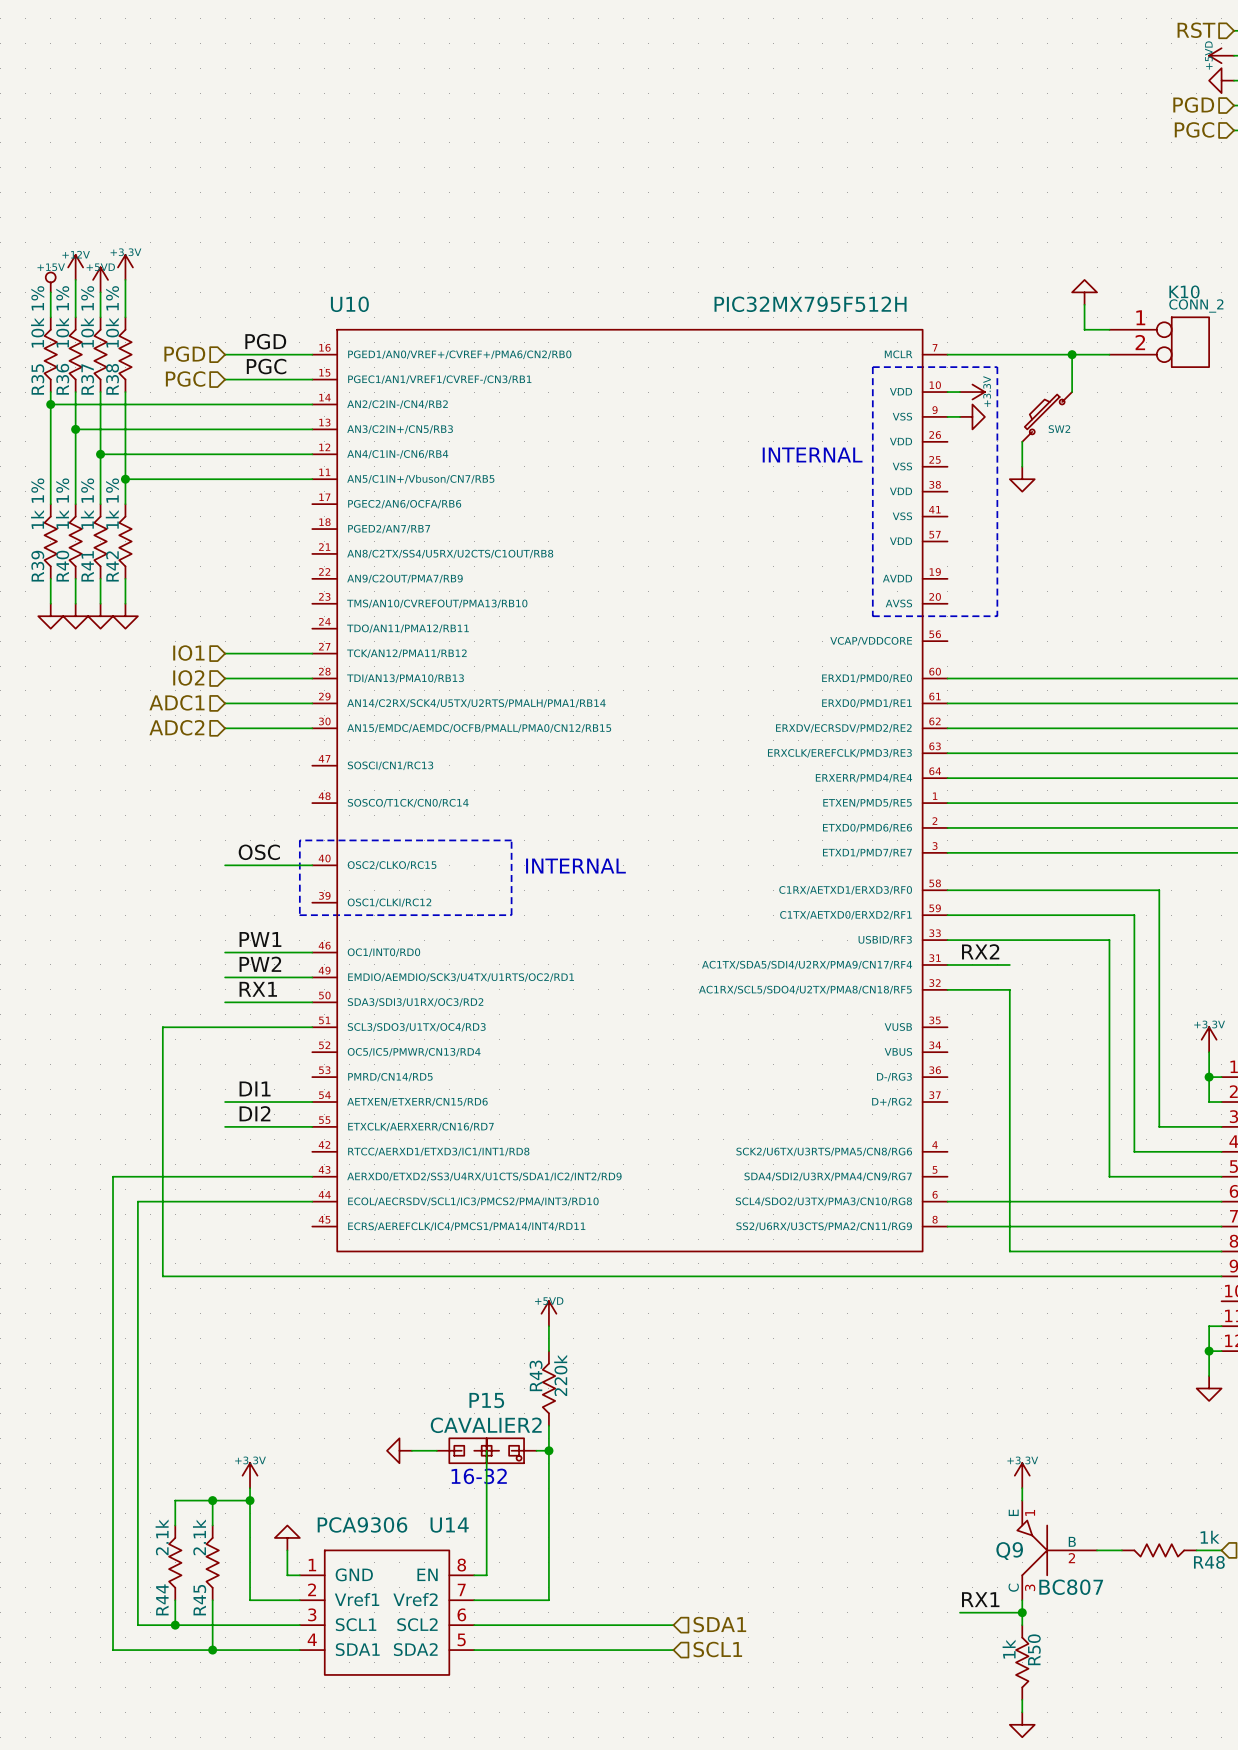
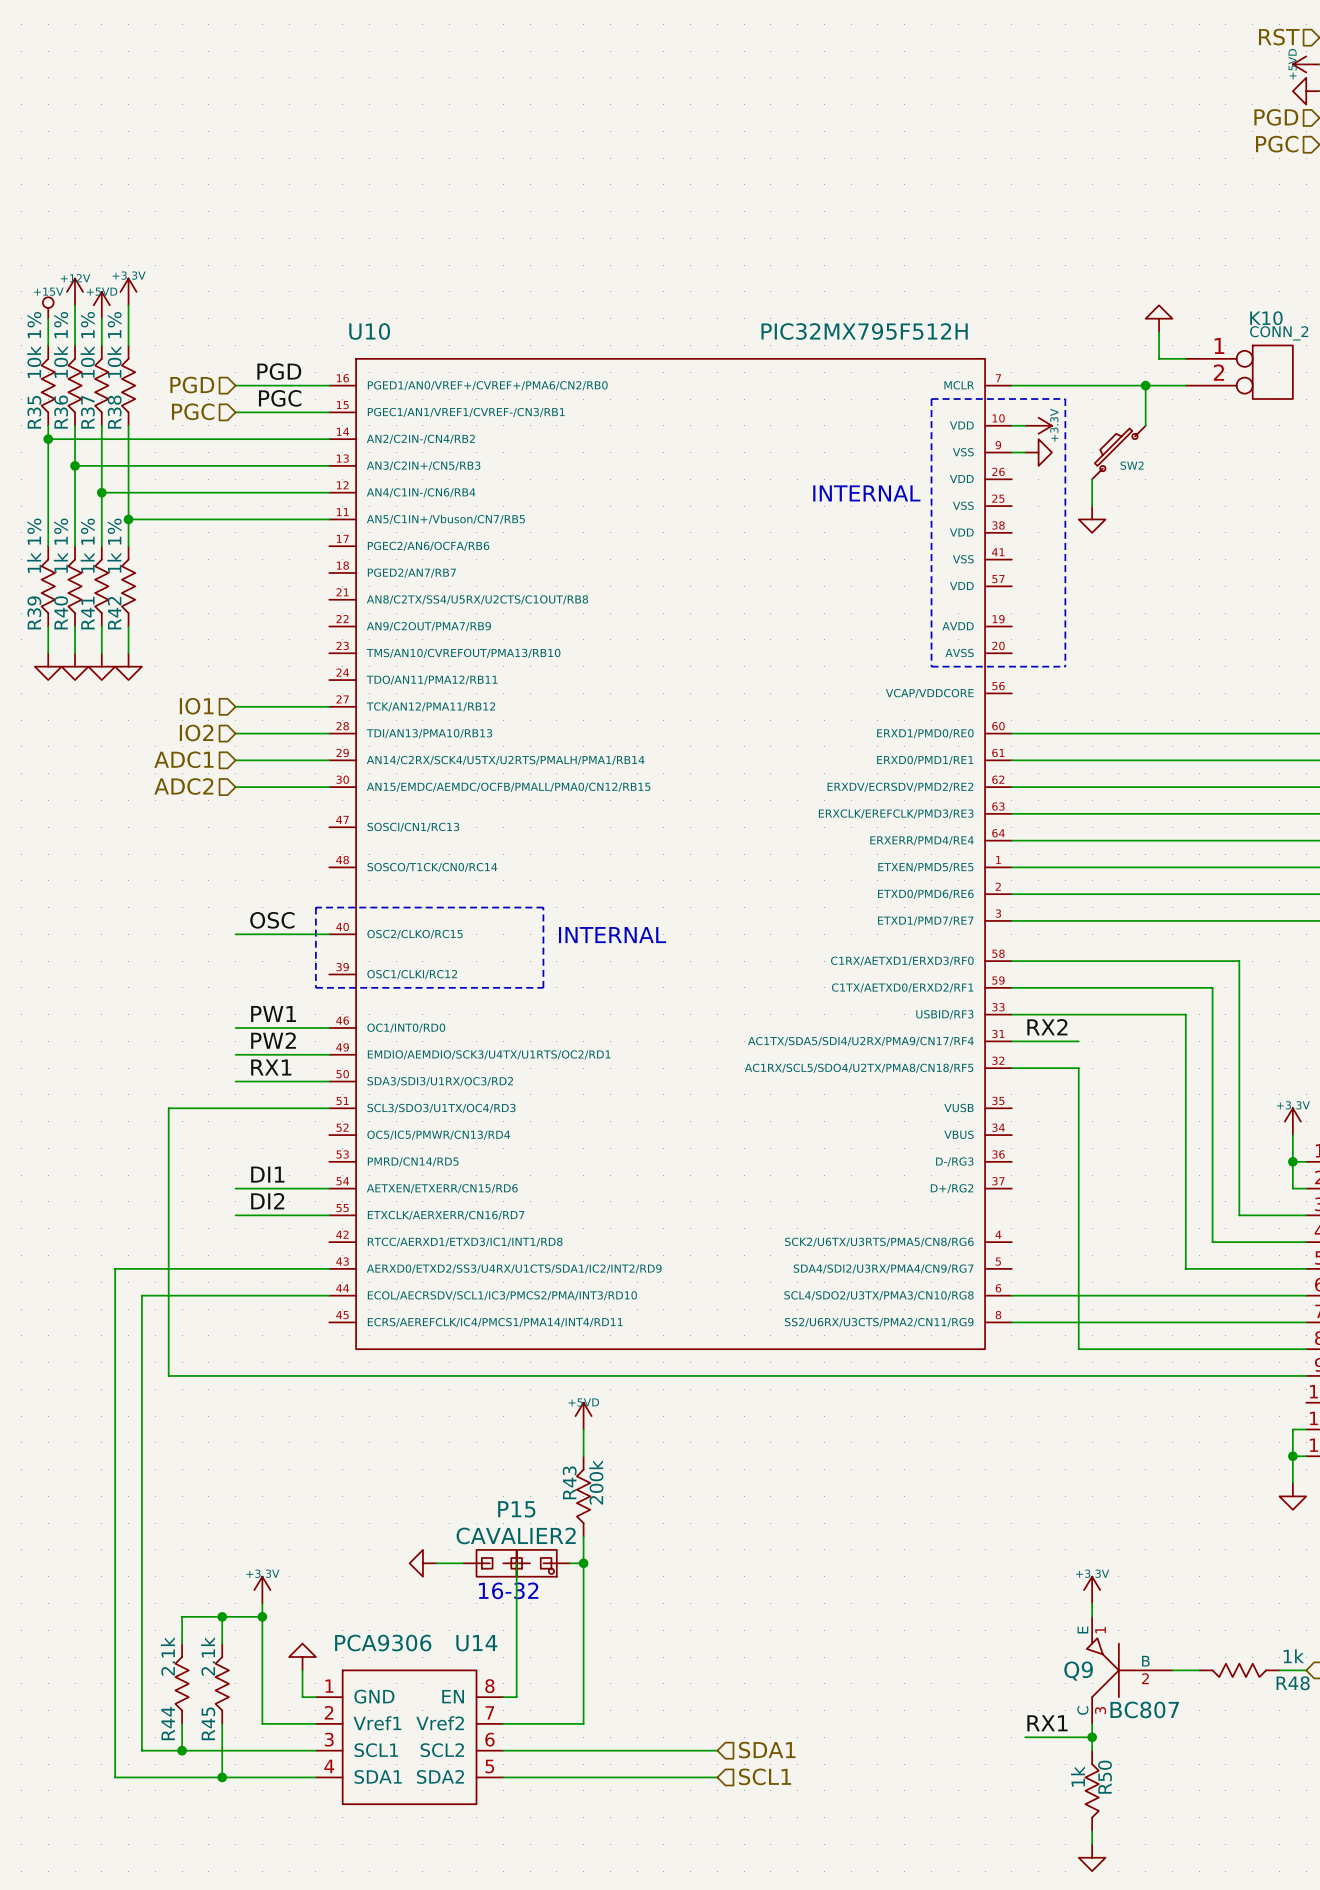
R43 value: 220k (560, 1375) -> 200k (596, 1482)

